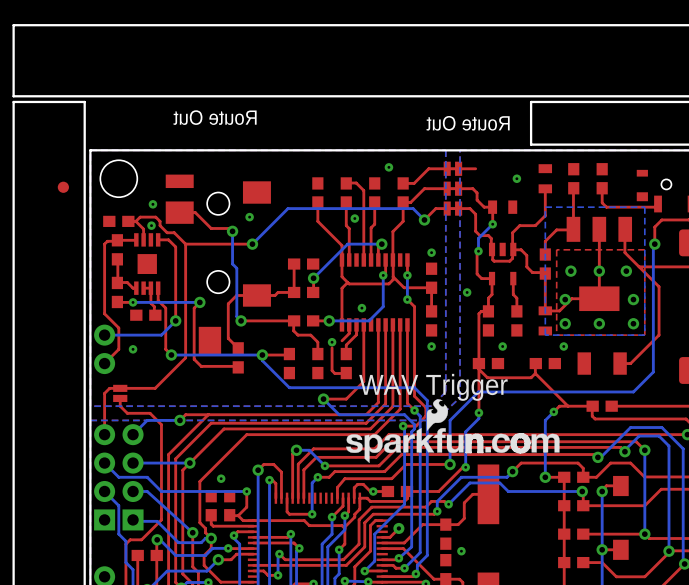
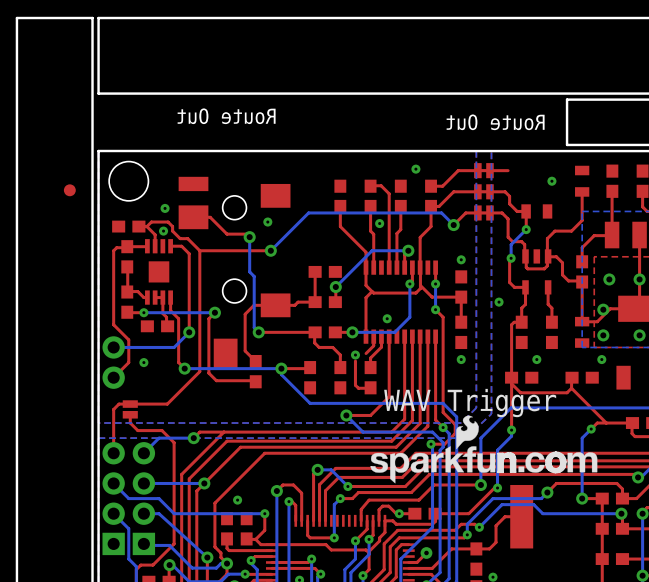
board edge: none -> (92, 18) (92, 99)
board edge: (90, 25) (84, 25) -> (98, 18) (98, 93)
board edge: (90, 96) (13, 96) -> none
board edge: (84, 101) (13, 101) -> (16, 93) (16, 99)

